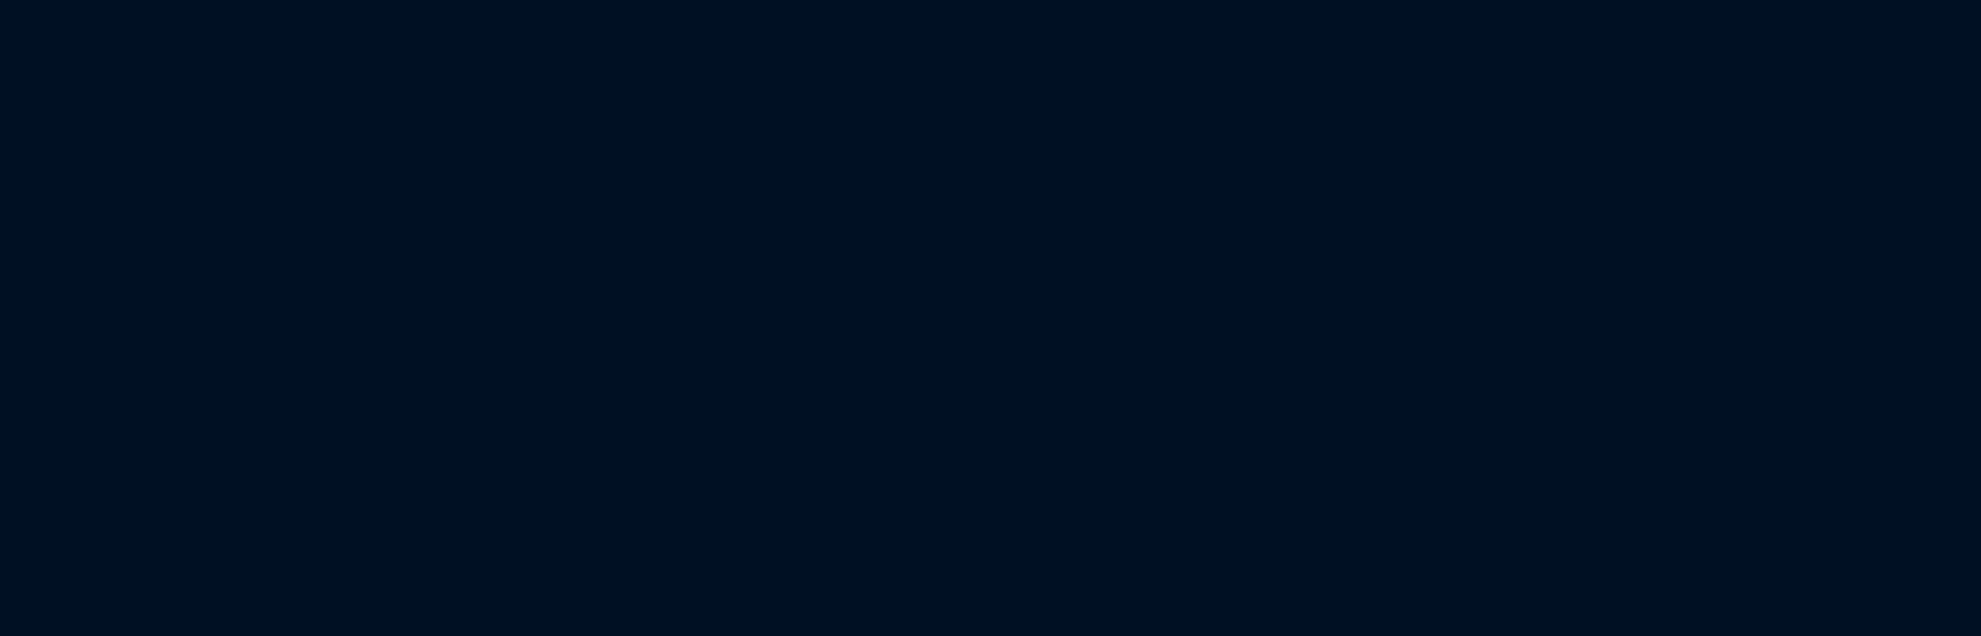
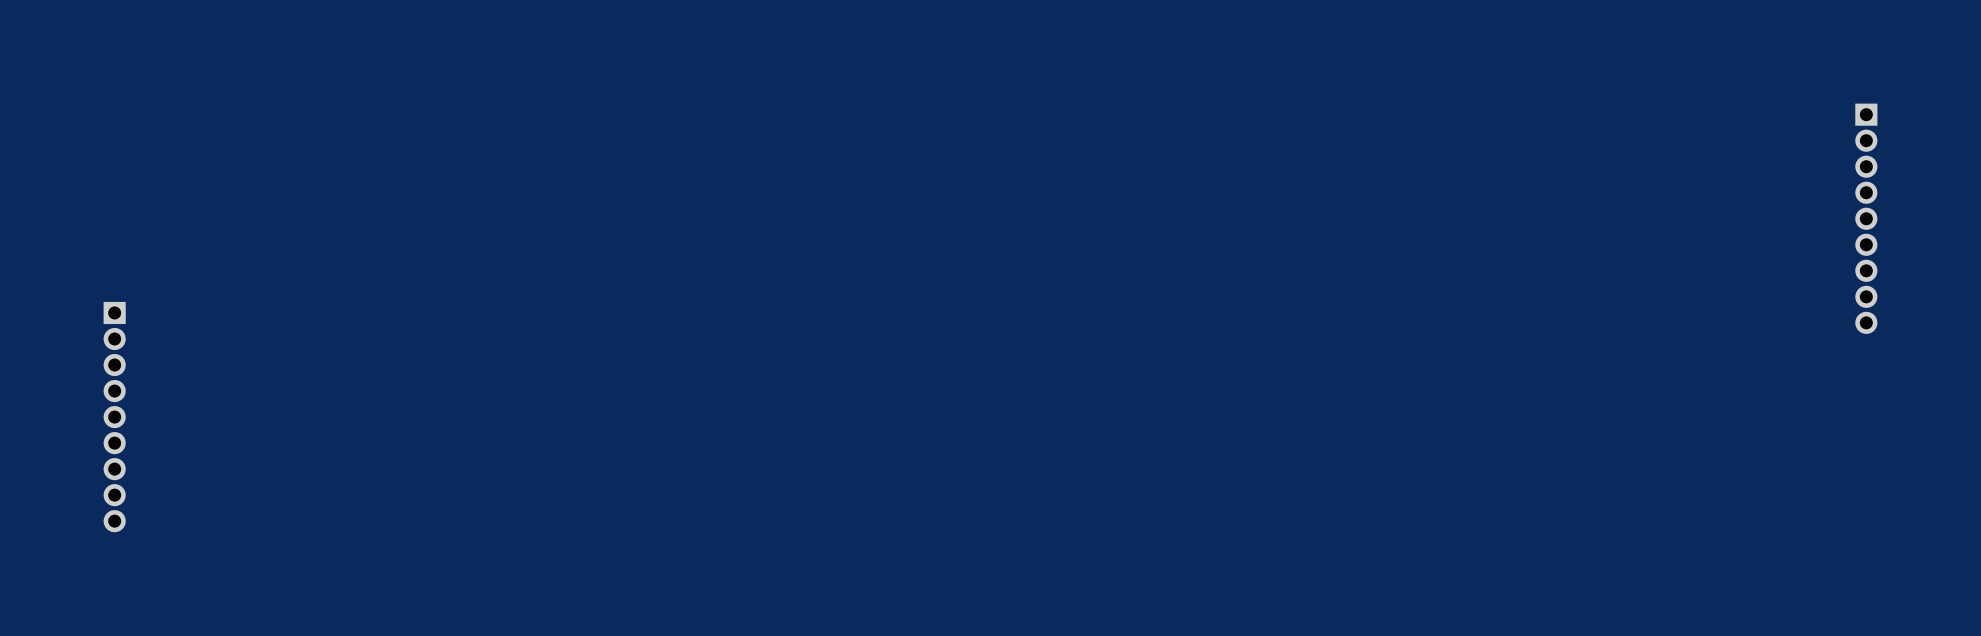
part: none -> (1866, 218)
part: none -> (114, 417)

